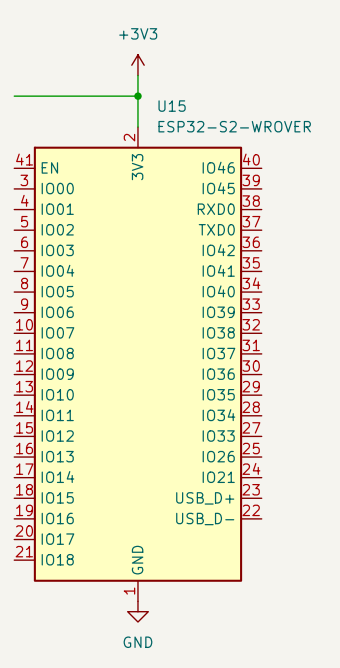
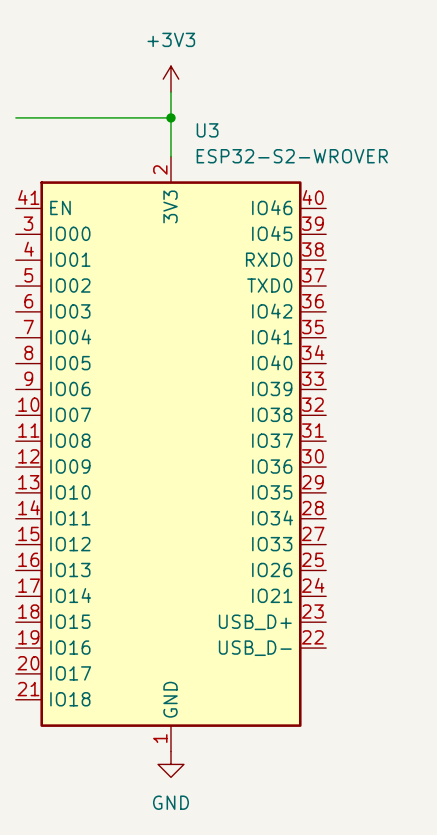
U15 name: U15 (172, 106) -> U3 (207, 130)

